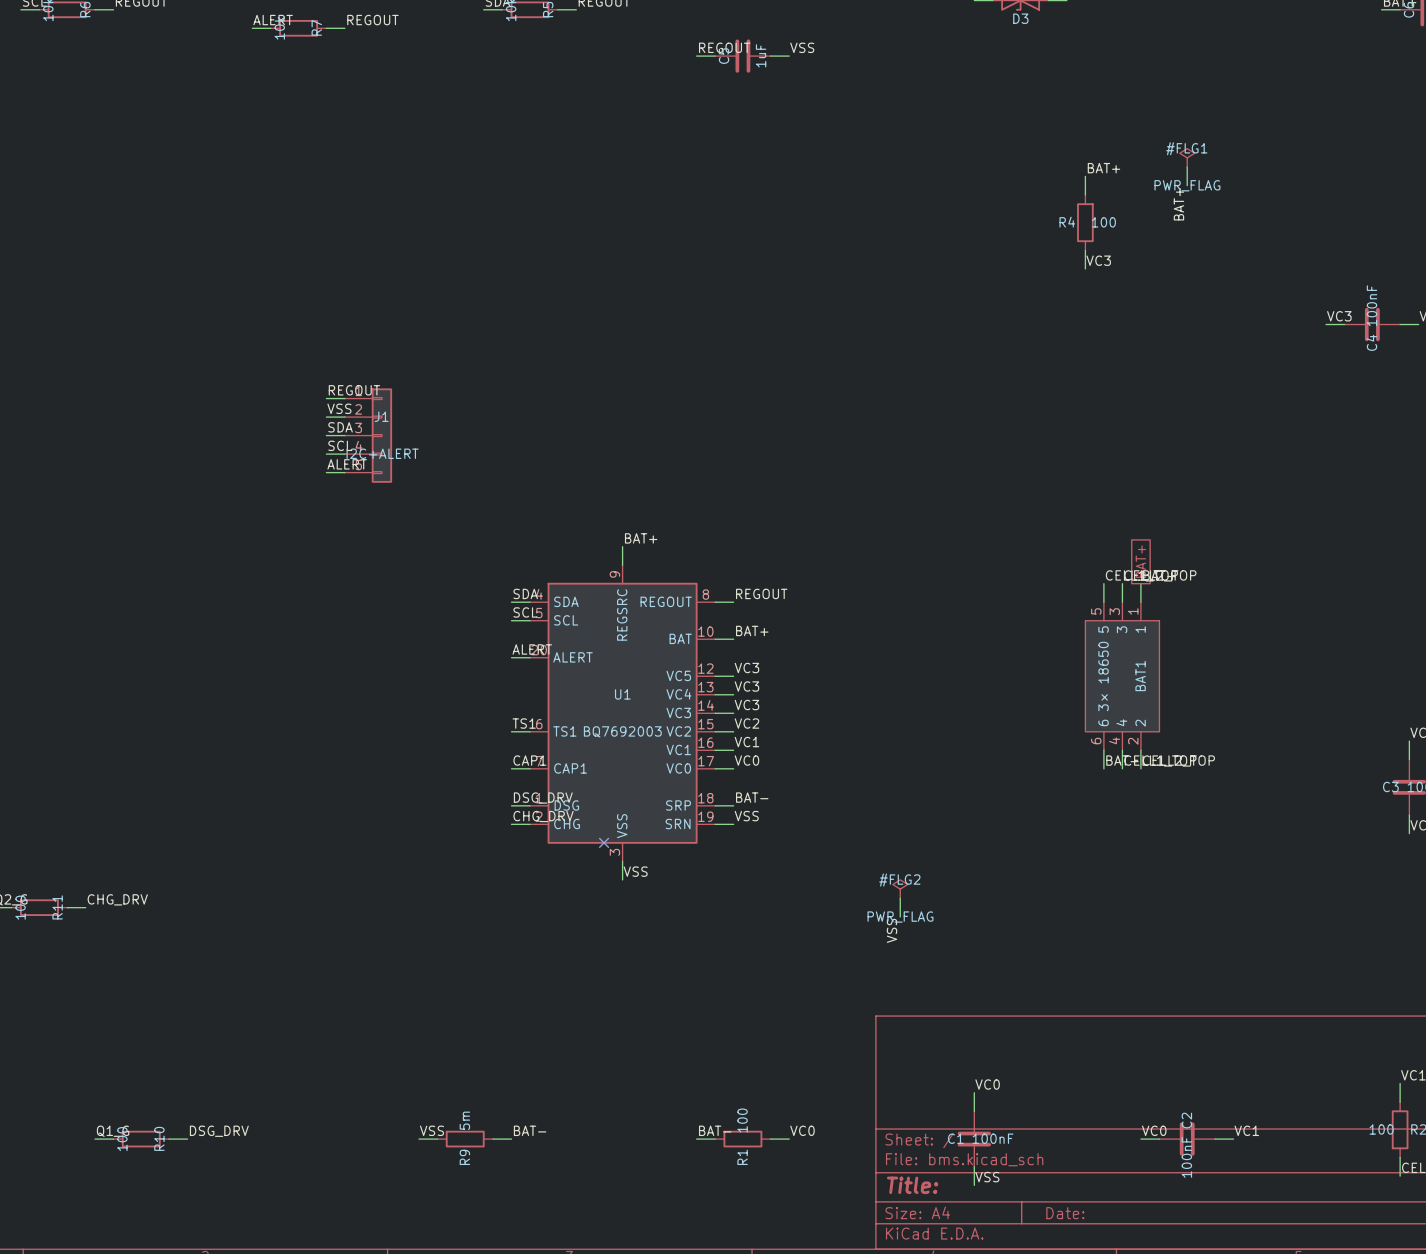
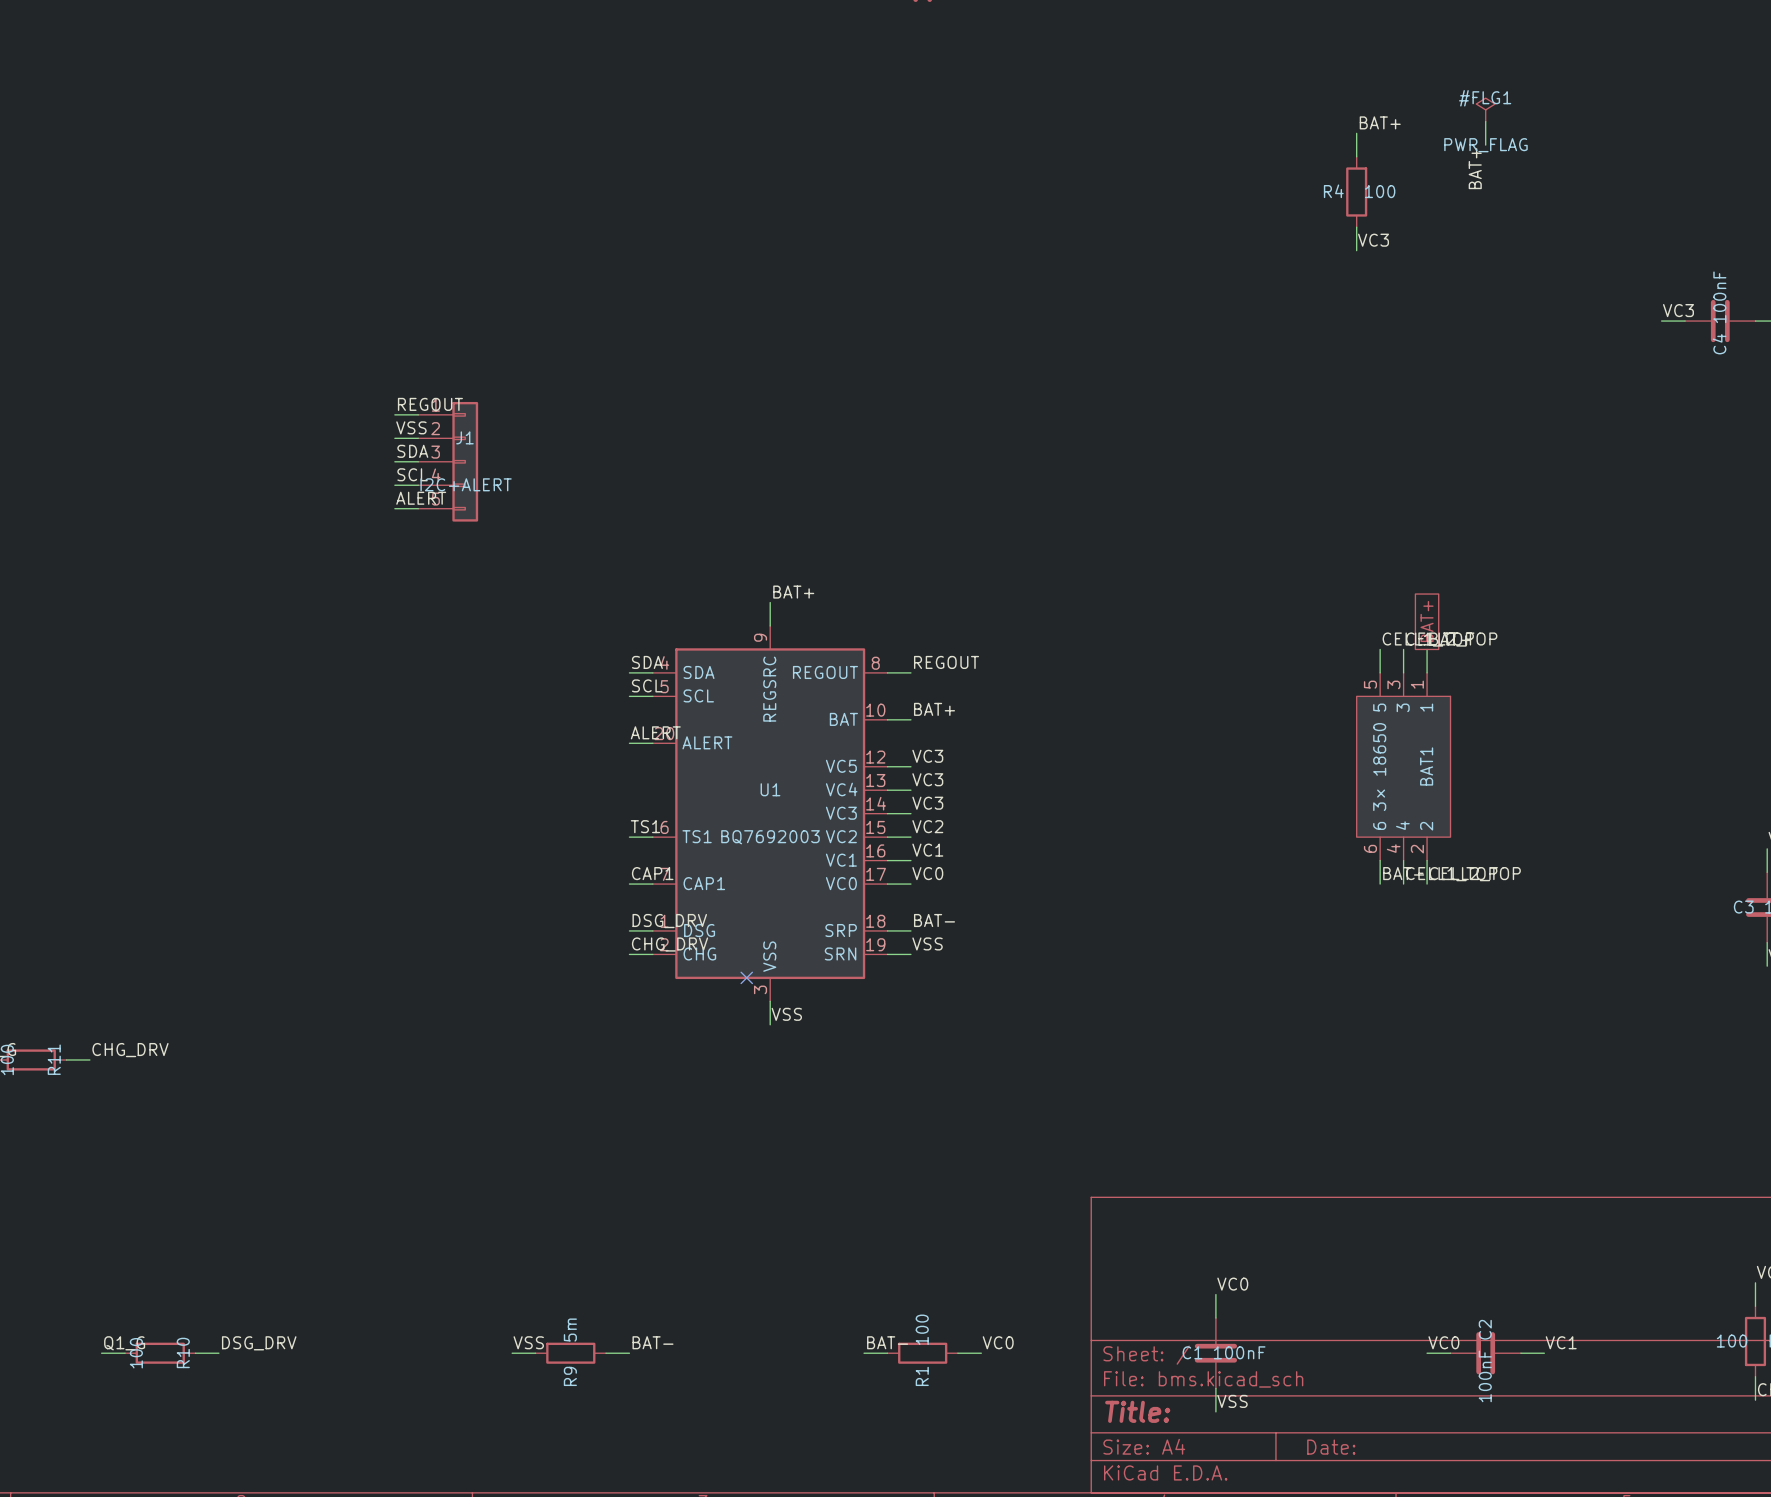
#FLG2: PWR_FLAG (900, 889) -> none
wire: (900, 898) (900, 916) -> none
label: VSS (892, 930) -> none

